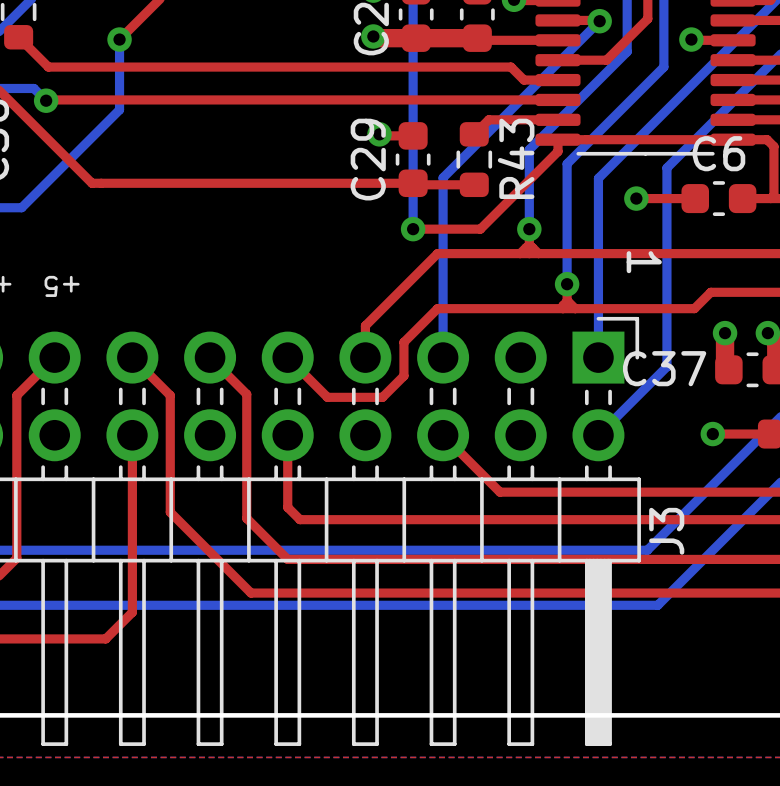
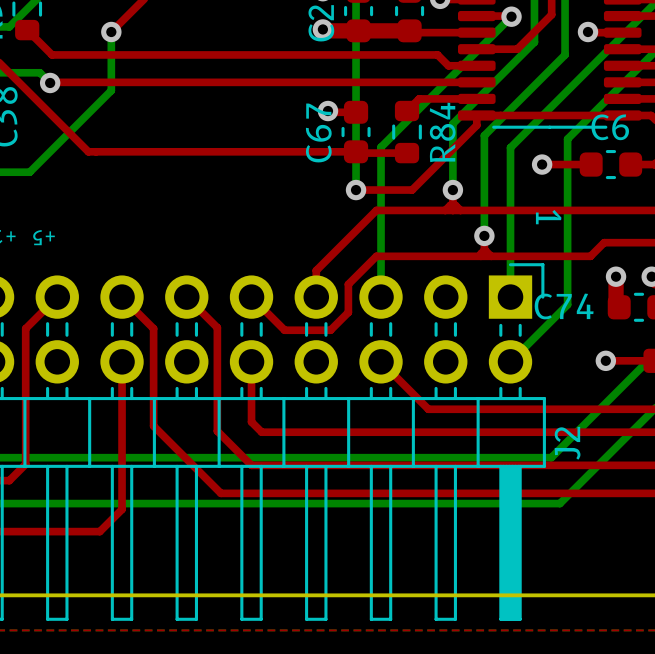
R43 name: R43 (516, 158) -> R84 (442, 132)
C29 name: C29 (368, 159) -> C67 (318, 132)
C37 name: C37 (664, 368) -> C74 (564, 306)
J3 name: J3 (666, 531) -> J2 (567, 443)

